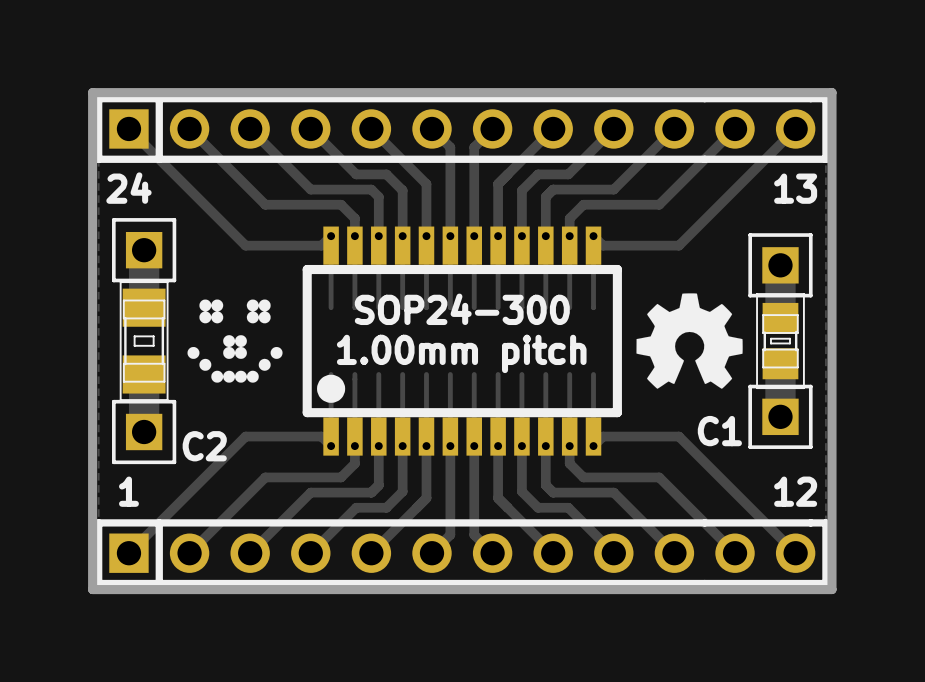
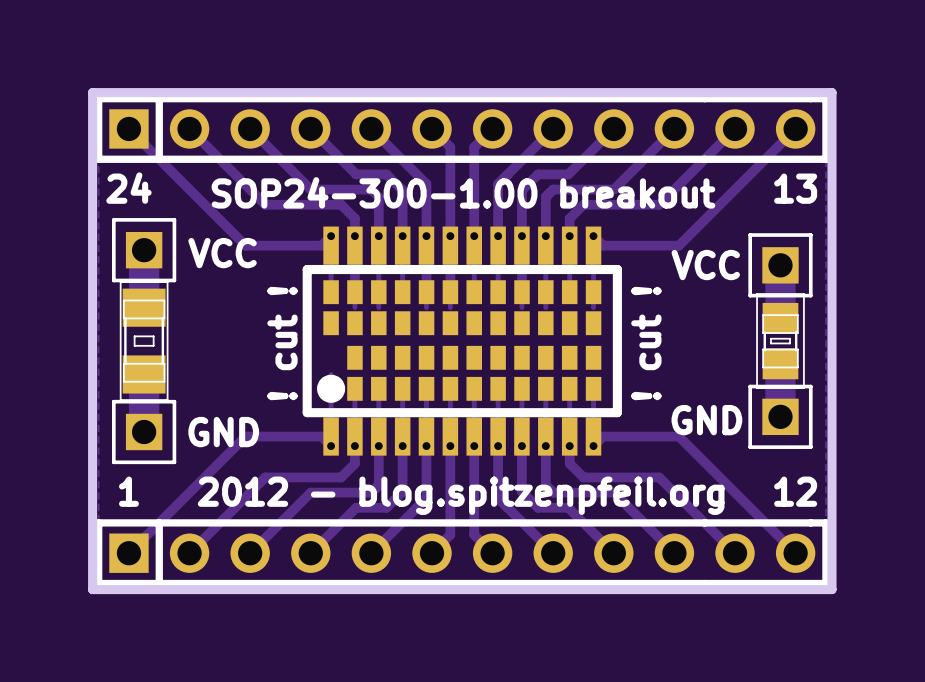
text: none -> SOP24-300-1.00 breakout (463, 192)
text: none -> VCC (222, 253)
text: none -> VCC (705, 265)
track: (331, 292) (331, 307) -> none
track: (402, 292) (402, 307) -> none
track: (474, 292) (474, 307) -> none
track: (498, 292) (498, 307) -> none
track: (569, 292) (569, 307) -> none
drawing: [636, 293, 743, 389] -> none
drawing: [187, 299, 283, 383] -> none
part: none -> (331, 307)
part: none -> (354, 307)
part: none -> (378, 307)
part: none -> (402, 307)
part: none -> (426, 307)
part: none -> (450, 307)
part: none -> (474, 307)
part: none -> (498, 307)
part: none -> (522, 307)
part: none -> (545, 307)
part: none -> (569, 307)
part: none -> (593, 307)
text: SOP24-300 (462, 309) -> none
text: none -> ! cut ! (282, 343)
text: none -> ! cut ! (646, 343)
text: 1.00mm pitch (461, 353) -> none
part: none -> (354, 373)
part: none -> (378, 373)
part: none -> (402, 373)
part: none -> (426, 373)
part: none -> (450, 373)
part: none -> (474, 373)
part: none -> (498, 373)
part: none -> (522, 373)
part: none -> (545, 373)
part: none -> (569, 373)
part: none -> (593, 373)
track: (354, 374) (354, 388) -> none
track: (378, 374) (378, 388) -> none
track: (402, 374) (402, 388) -> none
track: (426, 374) (426, 388) -> none
track: (450, 374) (450, 388) -> none
track: (474, 374) (474, 388) -> none
track: (498, 374) (498, 388) -> none
track: (521, 374) (521, 388) -> none
track: (545, 374) (545, 388) -> none
track: (569, 374) (569, 388) -> none
track: (593, 374) (593, 388) -> none
text: none -> GND (706, 420)
C1 name: C1 (719, 431) -> none
text: none -> GND (223, 432)
C2 name: C2 (204, 446) -> none
text: none -> 2012 - blog.spitzenpfeil.org (461, 495)

